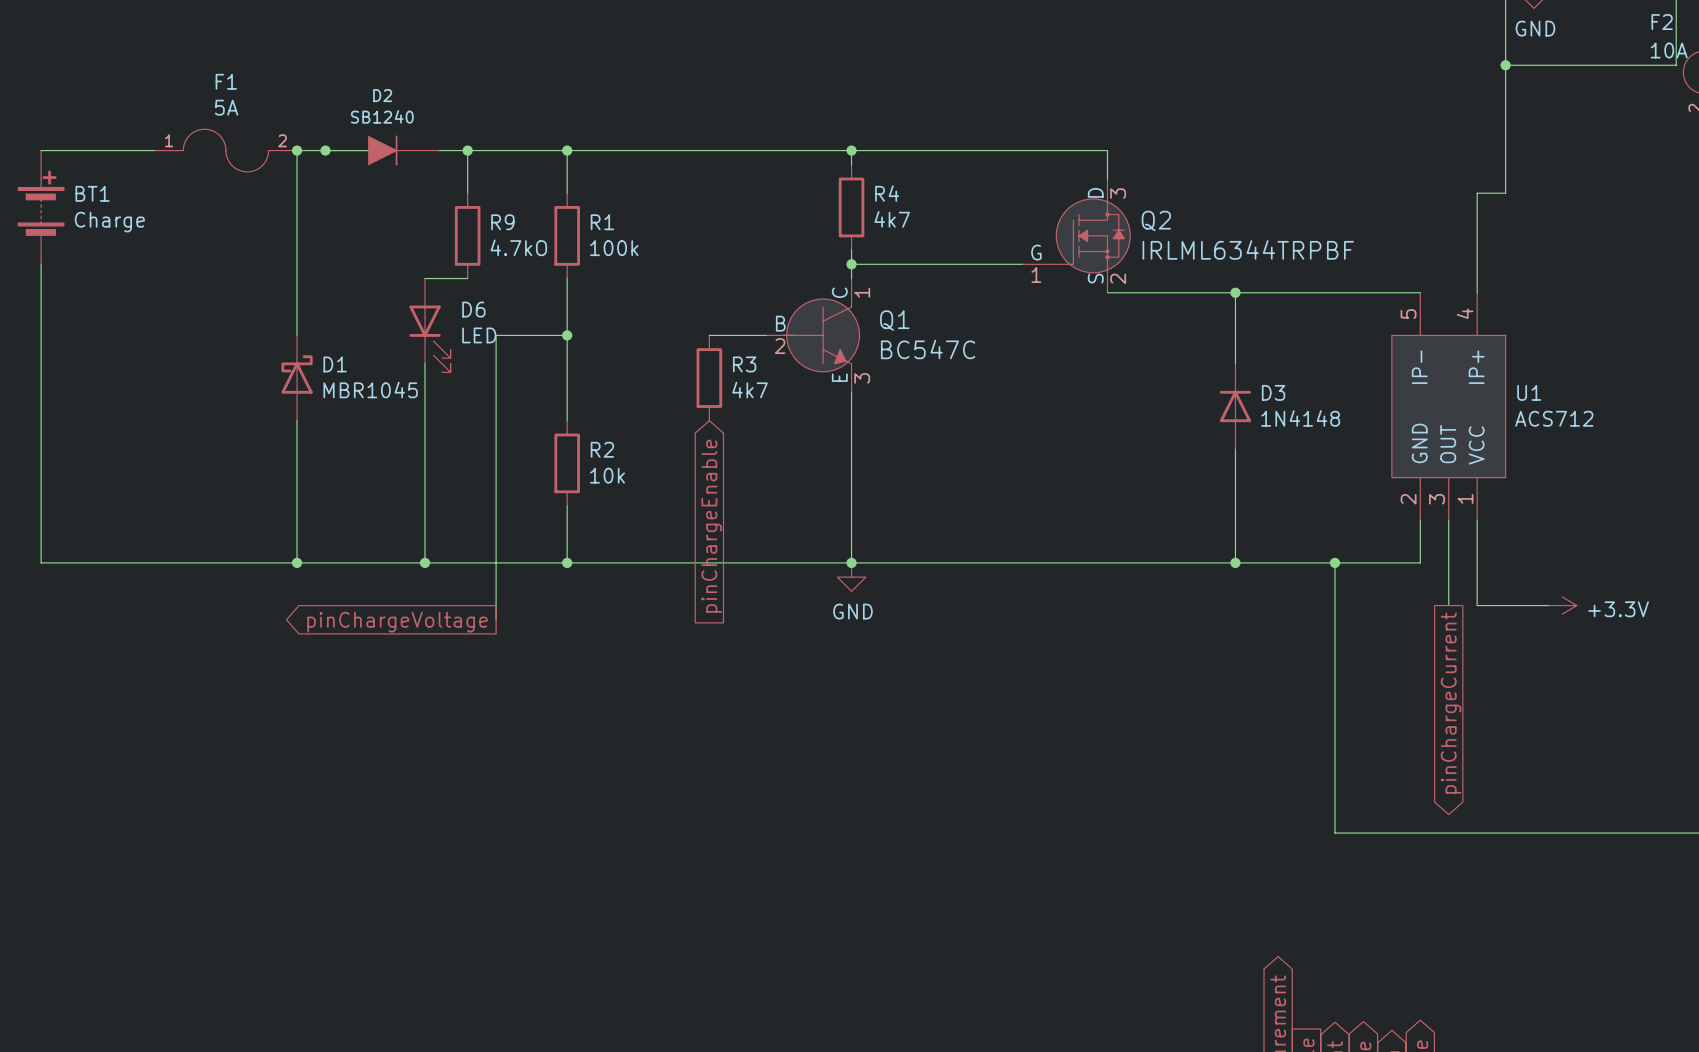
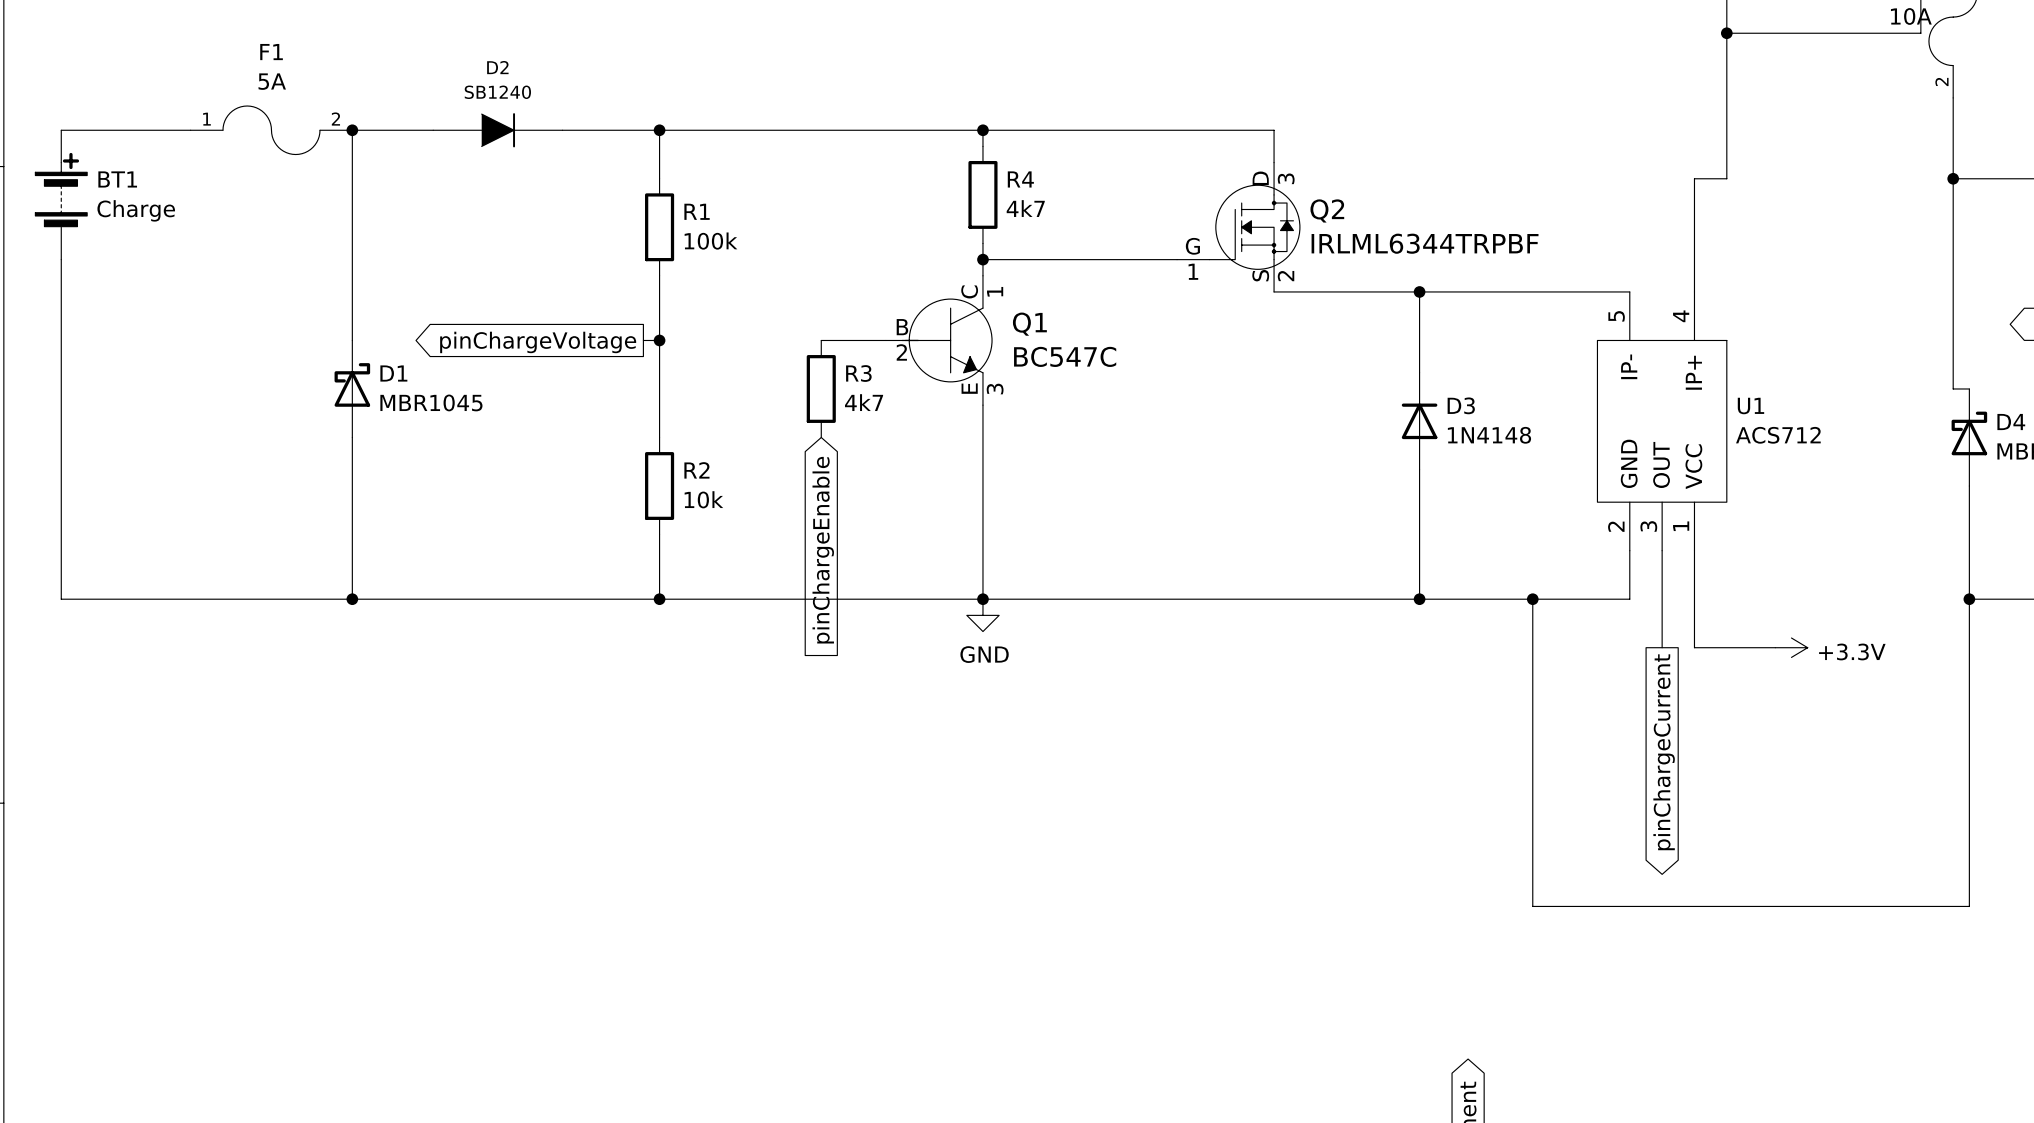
junction: (325, 150) -> none
D2 position: (382, 150) -> (497, 130)
wire: (467, 150) (467, 193) -> none
junction: (467, 150) -> none
R9: 4.7kO (467, 235) -> none
wire: (425, 278) (467, 278) -> none
D6: LED (429, 325) -> none
wire: (552, 335) (496, 335) (496, 619) -> none
global label: none -> pinChargeVoltage (538, 342)
wire: (425, 363) (425, 562) -> none
junction: (425, 562) -> none
global label: pinChargeVoltage (397, 622) -> none

